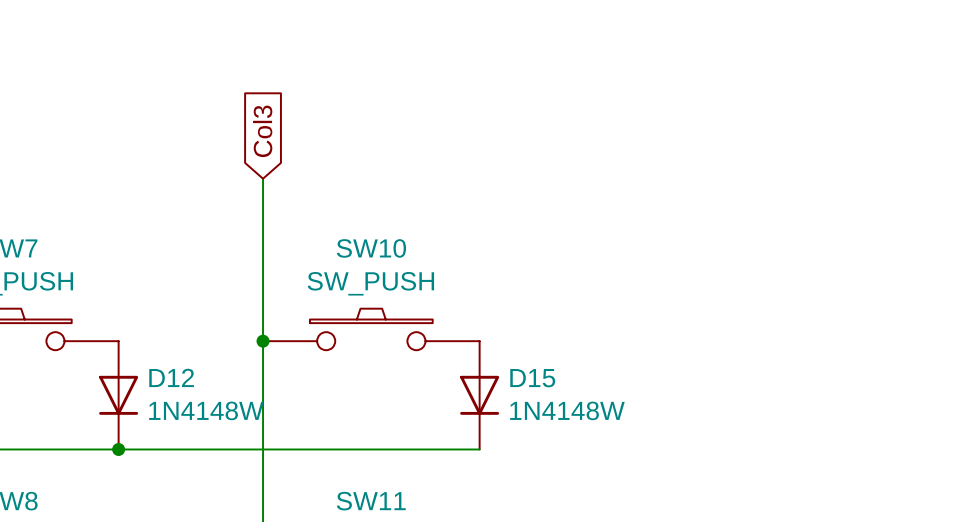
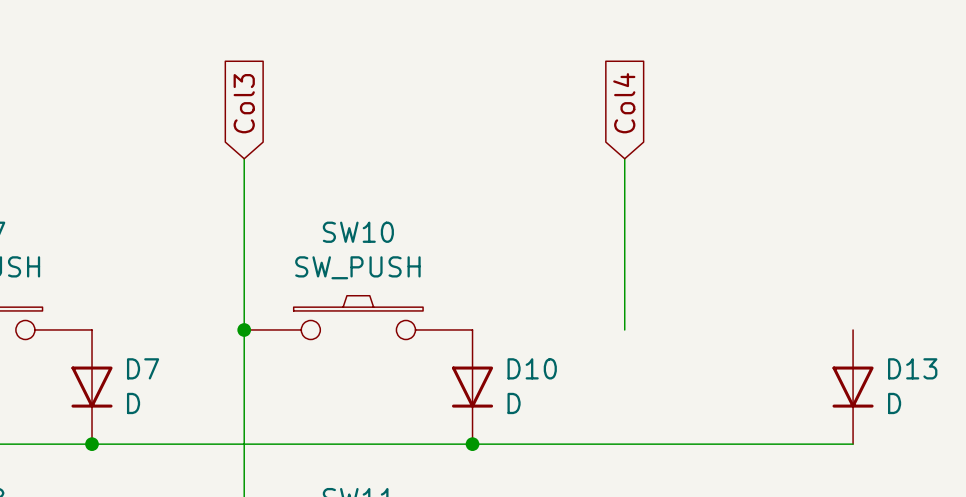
global label: none -> Col4 (624, 103)
wire: none -> (624, 158) (624, 329)
D12 name: D12 (171, 377) -> D7 (143, 368)
D15 name: D15 (532, 378) -> D10 (532, 368)
D13: none -> D (853, 387)
D12 value: 1N4148W (206, 410) -> D (133, 403)
D15 value: 1N4148W (567, 410) -> D (514, 403)
wire: none -> (472, 444) (853, 444)
junction: none -> (472, 444)

